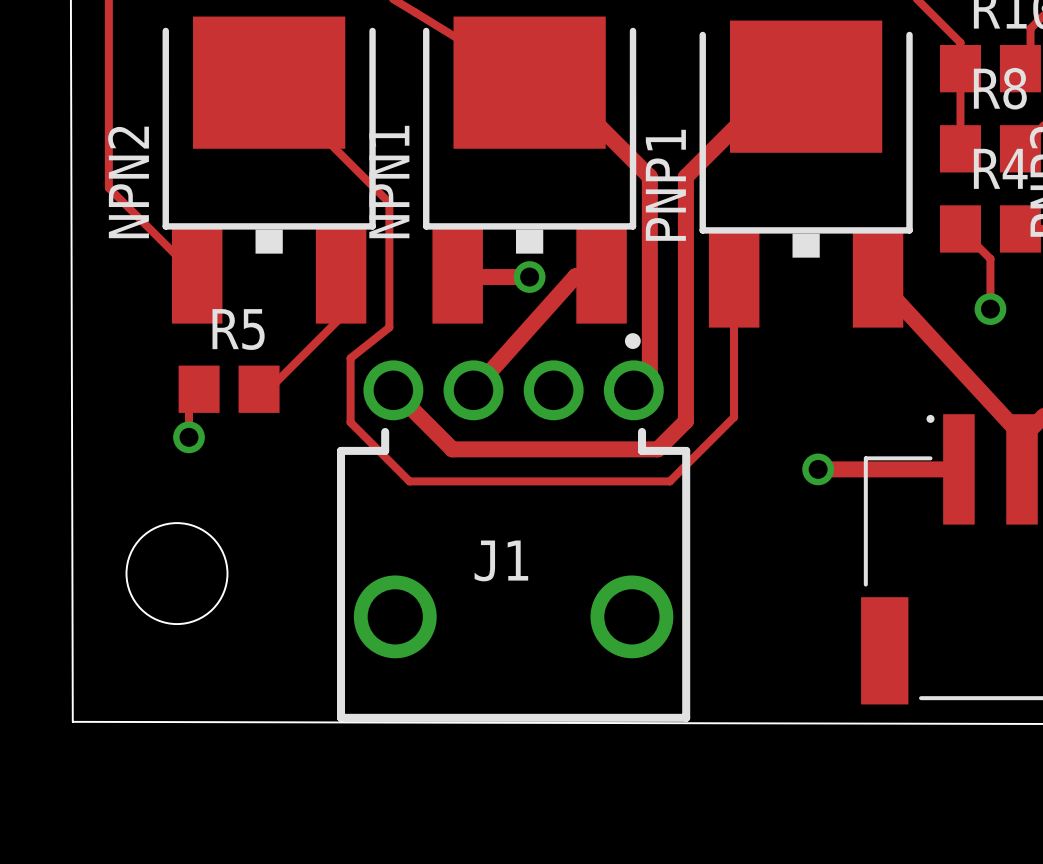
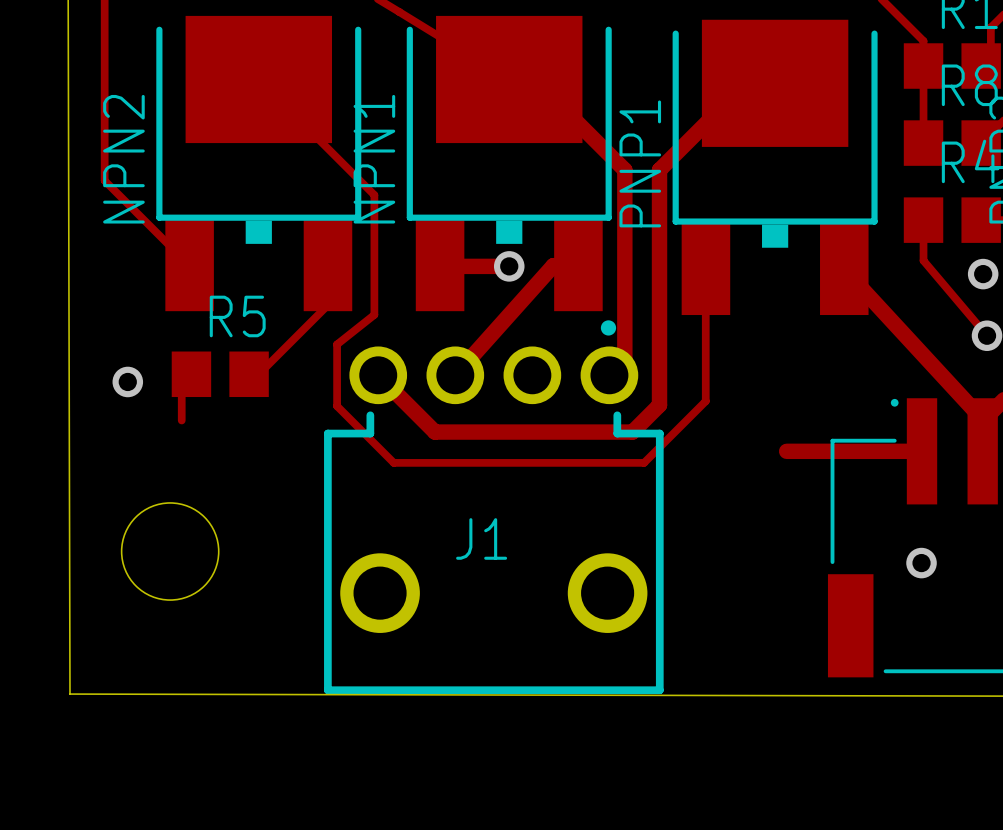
track: (960, 228) (990, 258) (990, 309) -> (923, 220) (923, 260) (987, 335)
via: none -> (983, 274)
via: (990, 309) -> none
via: none -> (987, 335)
via position: (189, 437) -> (127, 381)
via: (818, 469) -> none
via: none -> (921, 563)

